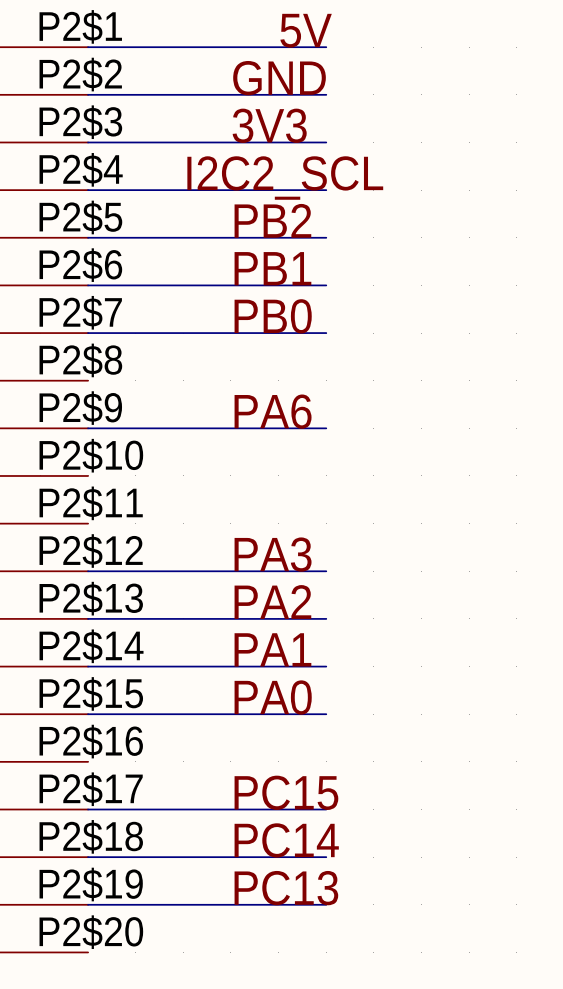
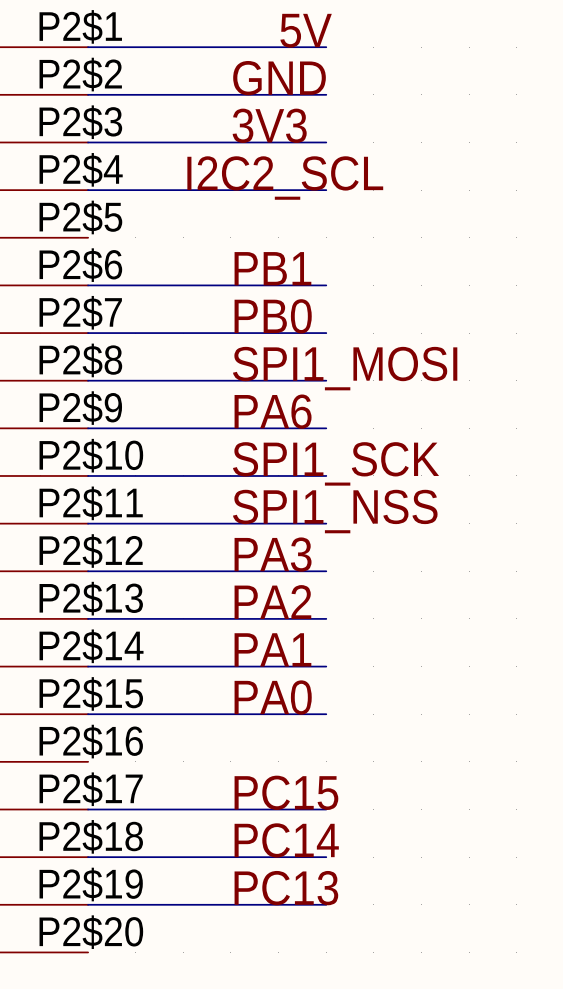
label: PB2 (272, 220) -> none
wire: (88, 237) (326, 237) -> (88, 380) (326, 380)
label: none -> SPI1_MOSI (345, 368)
label: none -> SPI1_SCK (336, 463)
wire: none -> (88, 475) (326, 475)
label: none -> SPI1_NSS (335, 511)
wire: none -> (88, 523) (326, 523)

